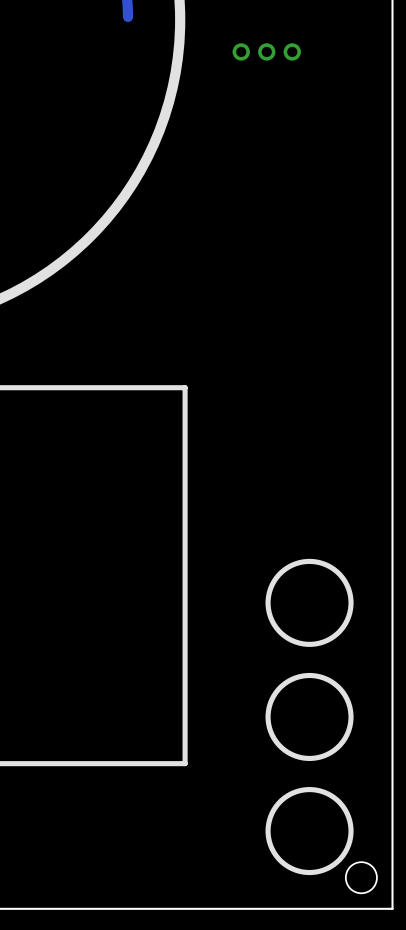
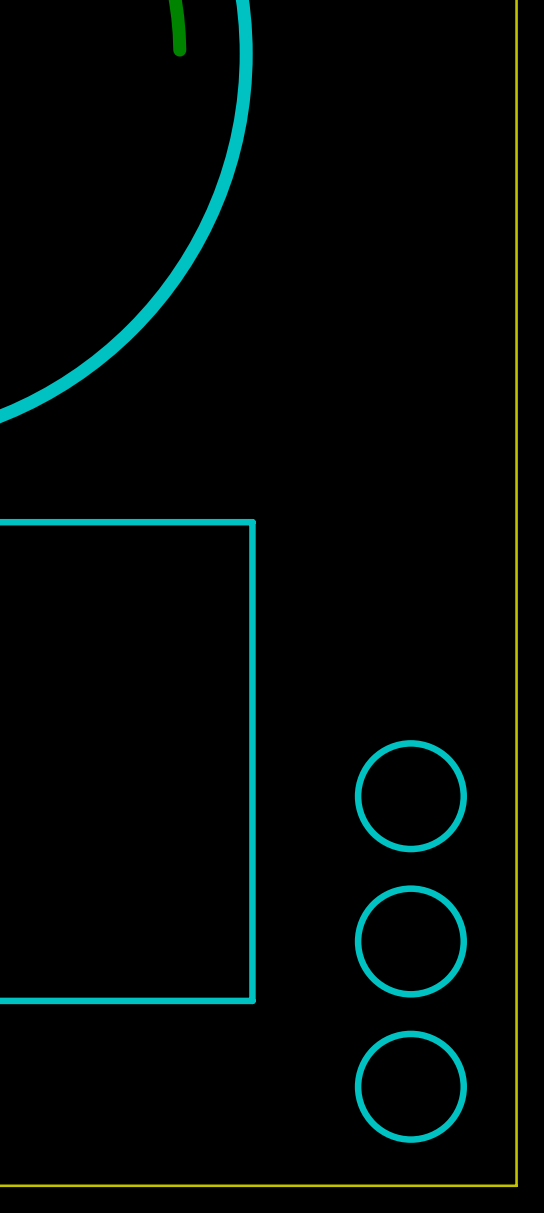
part: (266, 51) -> none
round board edge: [345, 861, 378, 894] -> none

